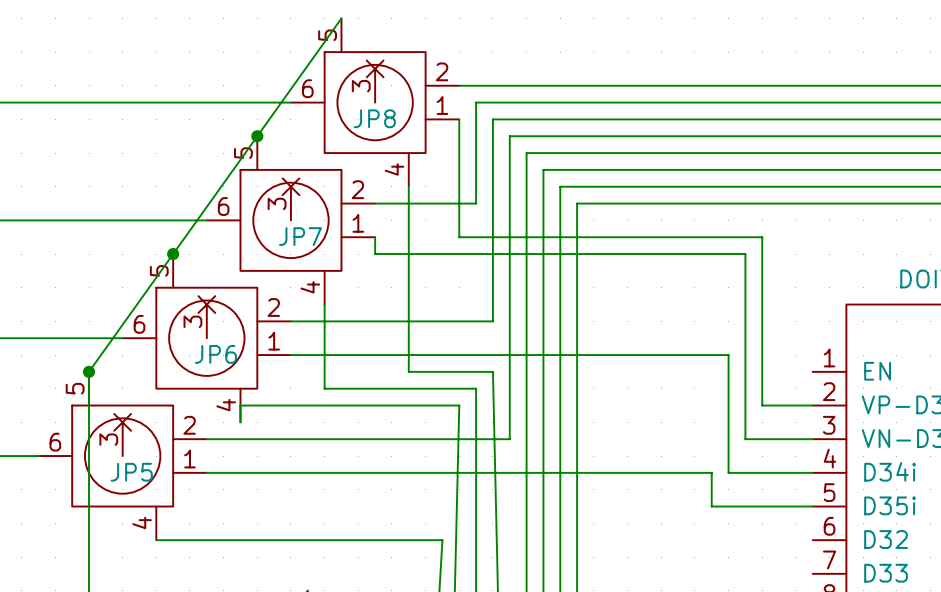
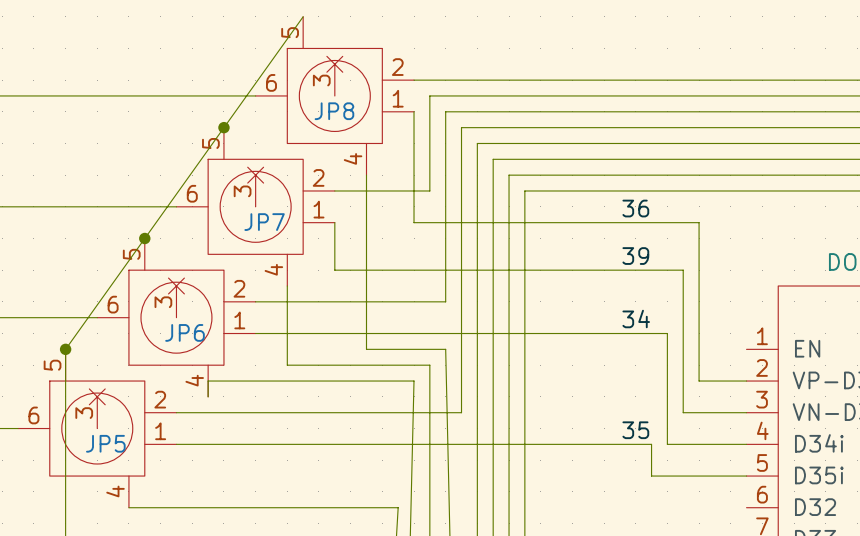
label: none -> 36 (635, 208)
wire: (375, 254) (745, 254) (745, 287) -> (334, 238) (334, 270) (683, 270)
label: none -> 39 (635, 256)
label: none -> 34 (636, 319)
label: none -> 35 (635, 430)

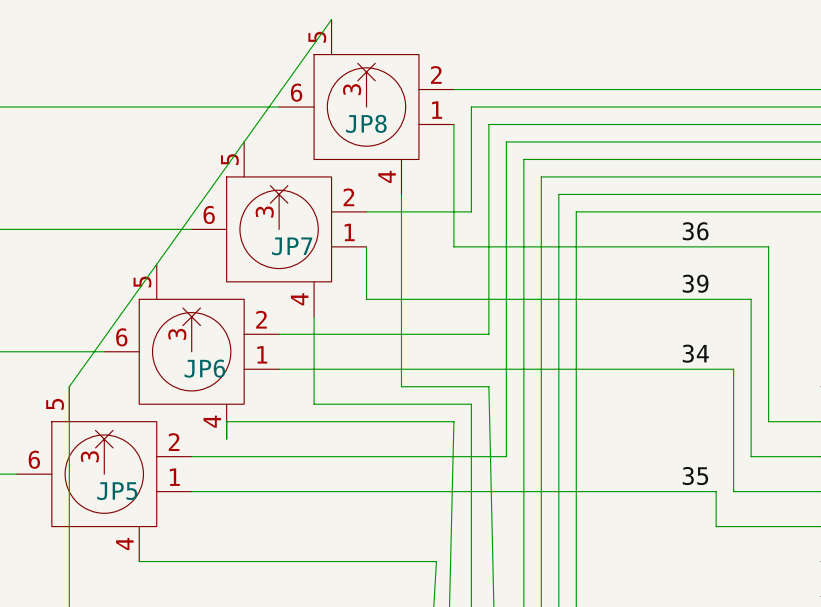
junction: (223, 127) -> none
junction: (144, 238) -> none
junction: (65, 349) -> none

